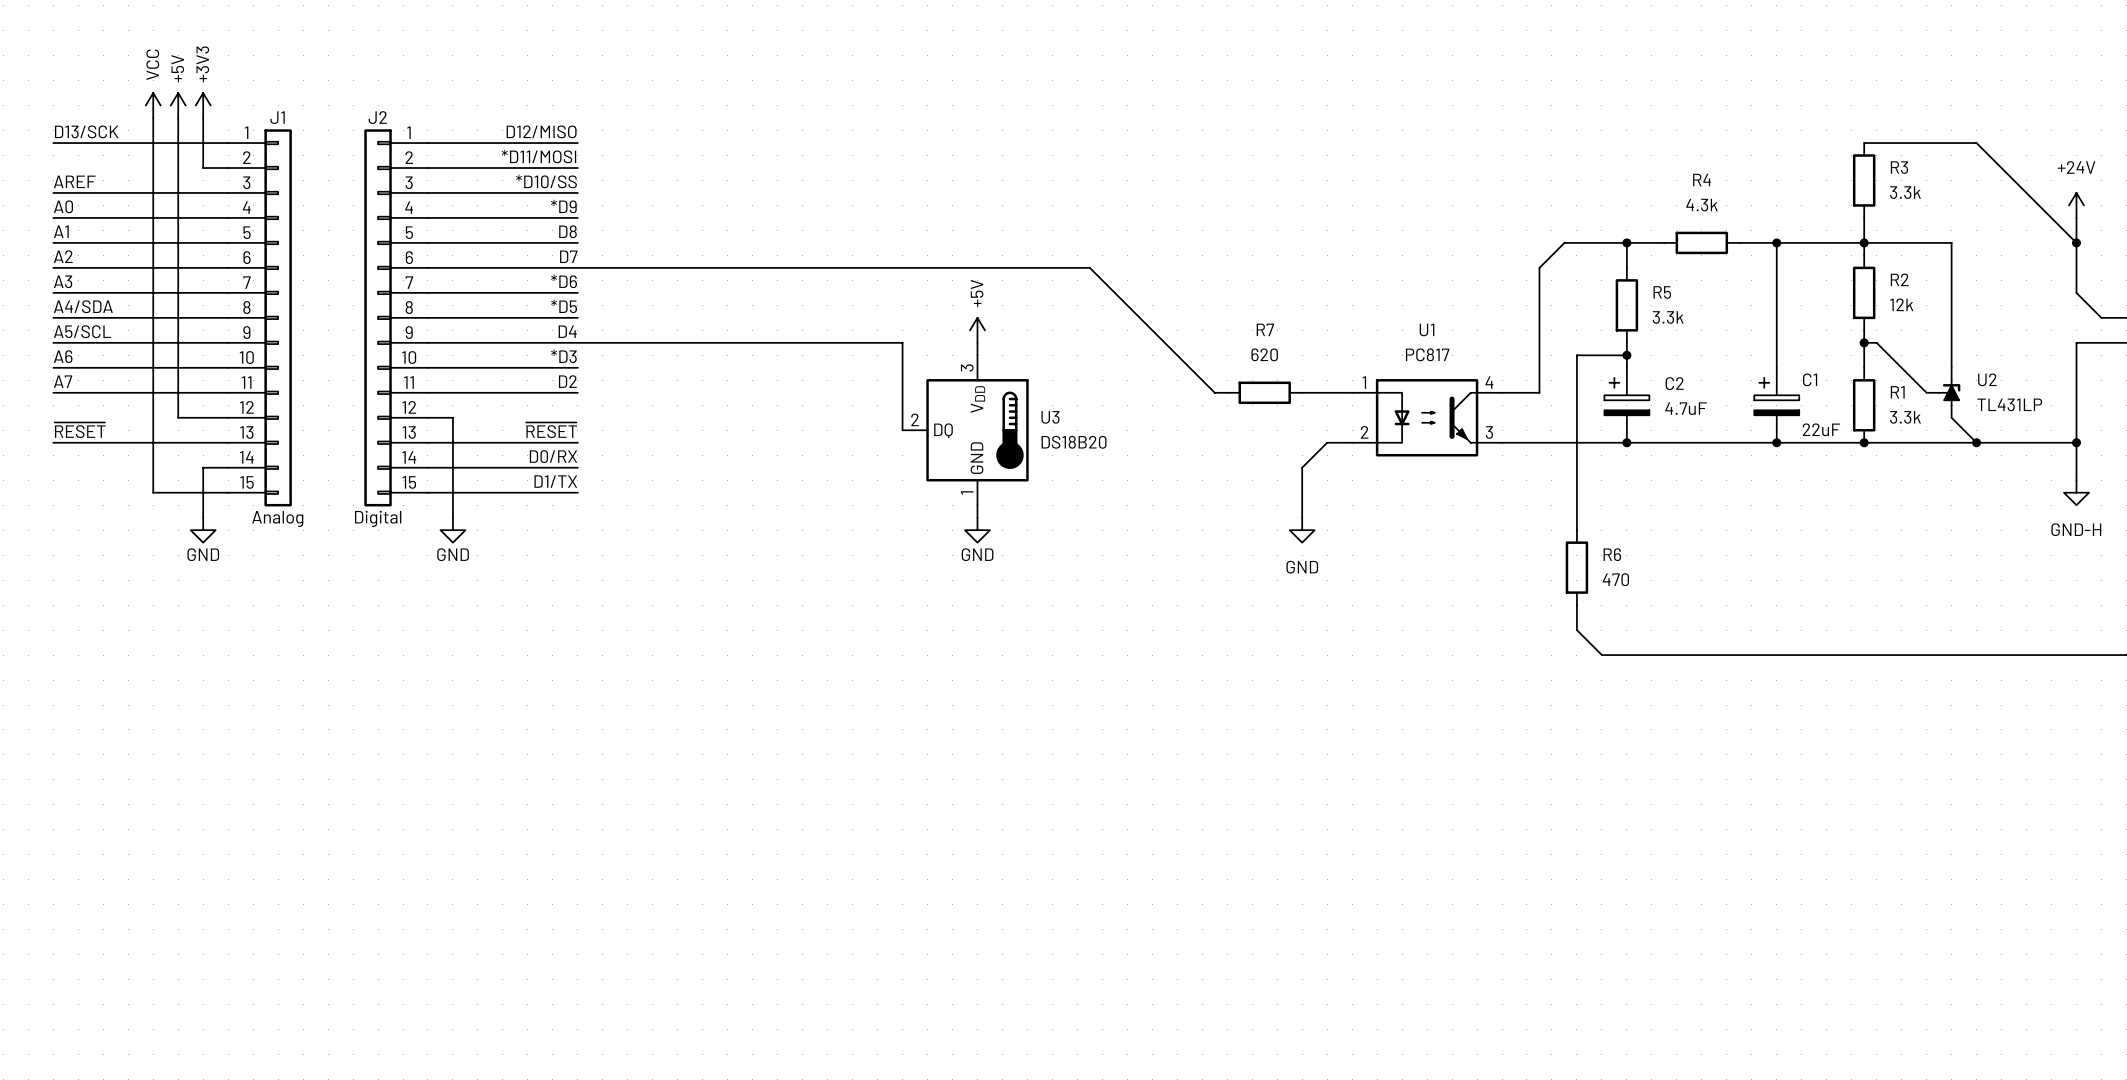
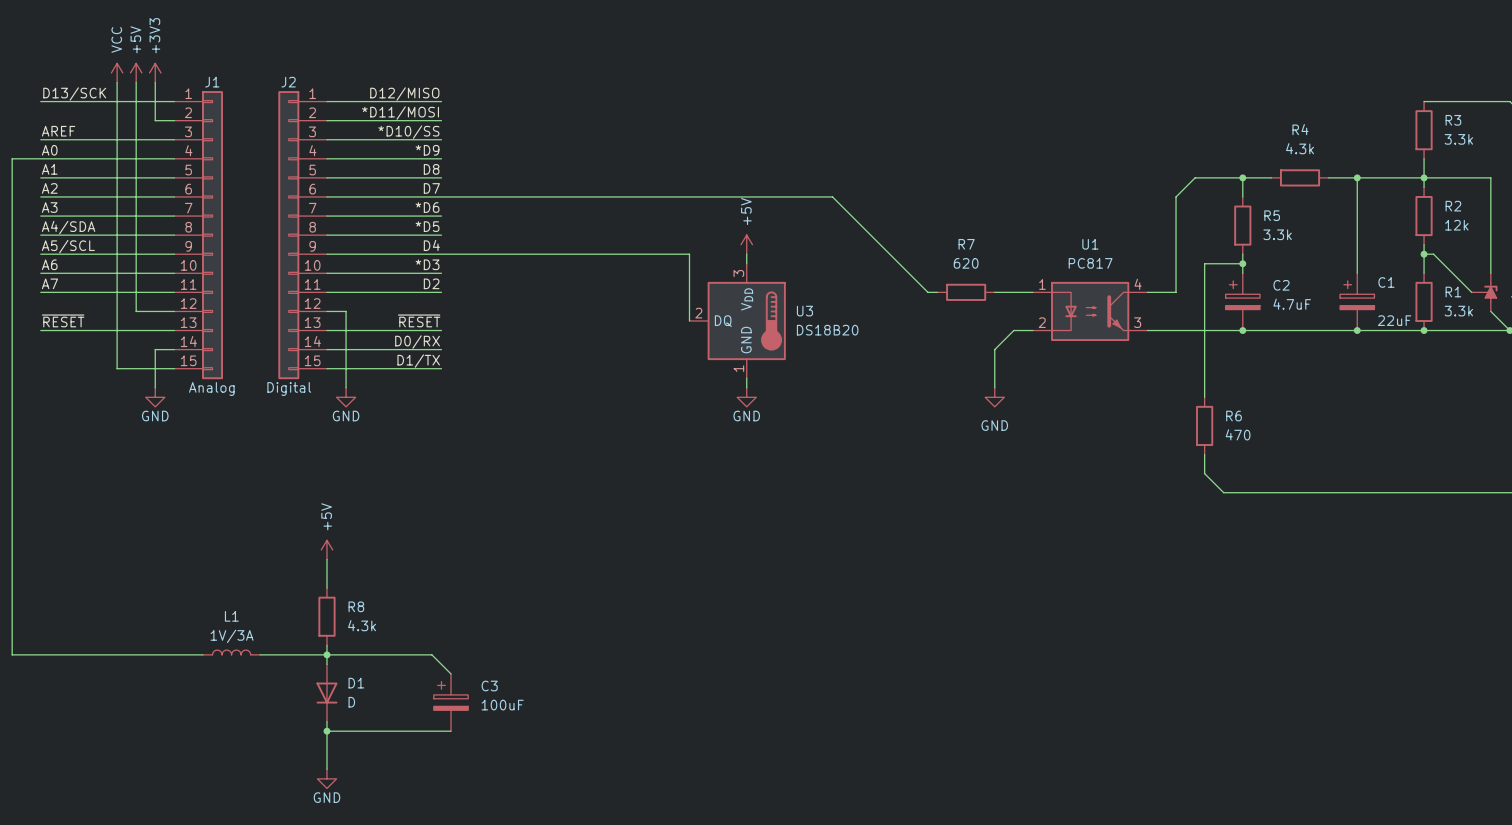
wire: none -> (40, 158) (12, 158) (12, 654) (202, 654)
power symbol: none -> +5V (326, 549)
wire: none -> (326, 559) (326, 588)
R8: none -> 4.3k (326, 616)
wire: none -> (326, 645) (326, 664)
L1: none -> 1V/3A (231, 652)
wire: none -> (260, 654) (431, 654) (451, 673)
junction: none -> (326, 654)
D1: none -> D (326, 693)
C3: none -> 100uF (451, 702)
wire: none -> (326, 721) (326, 769)
wire: none -> (326, 731) (451, 731)
junction: none -> (326, 731)
power symbol: none -> GND (326, 778)

